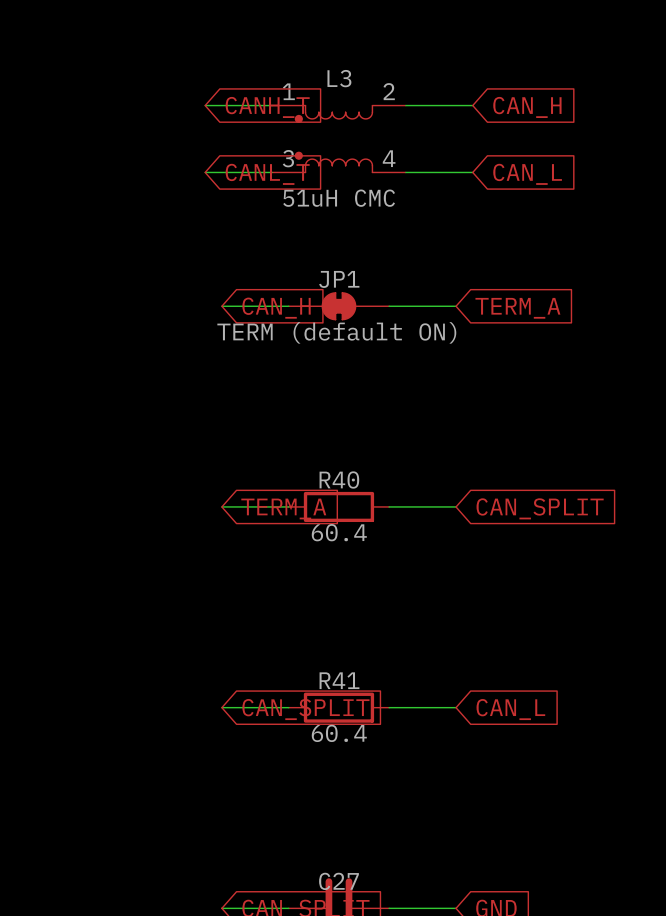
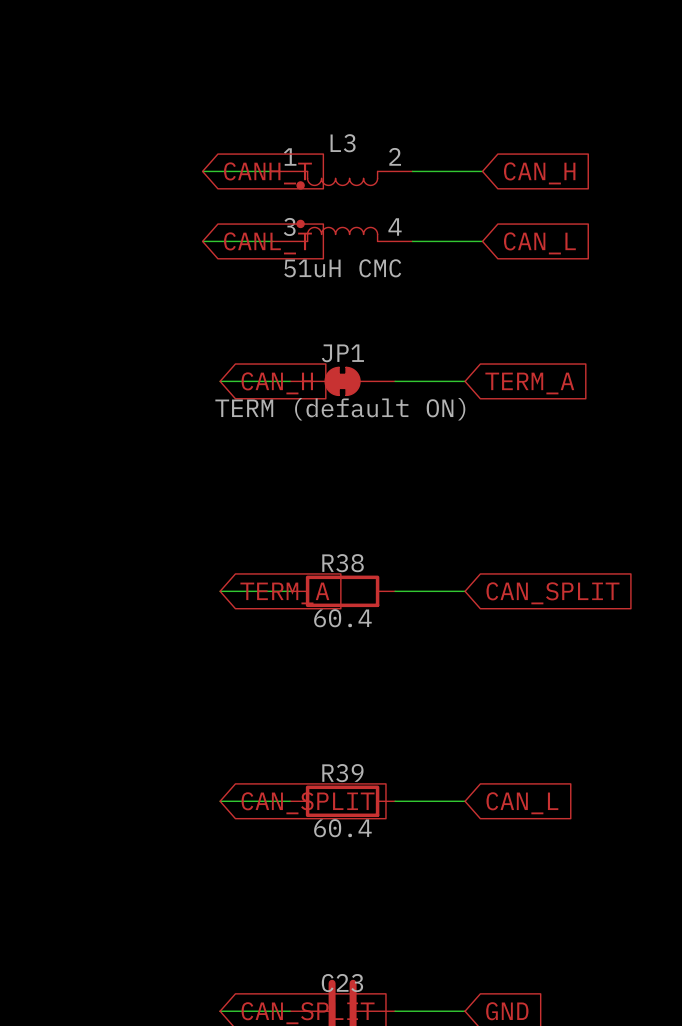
R40 name: R40 (339, 480) -> R38 (343, 563)
R41 name: R41 (339, 680) -> R39 (342, 773)
C27 name: C27 (338, 881) -> C23 (342, 983)

